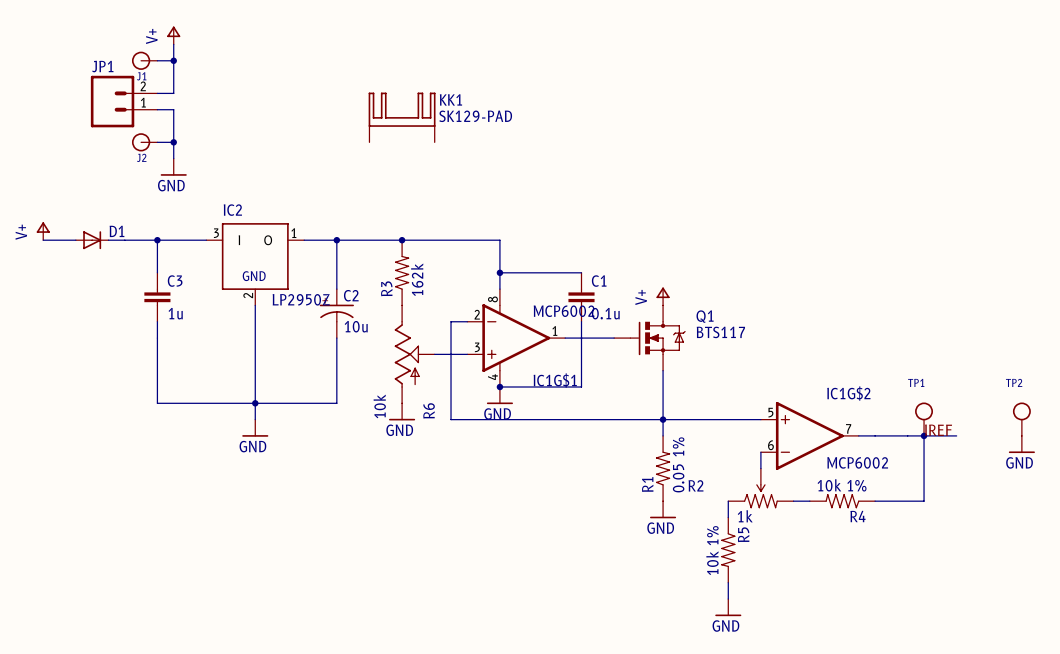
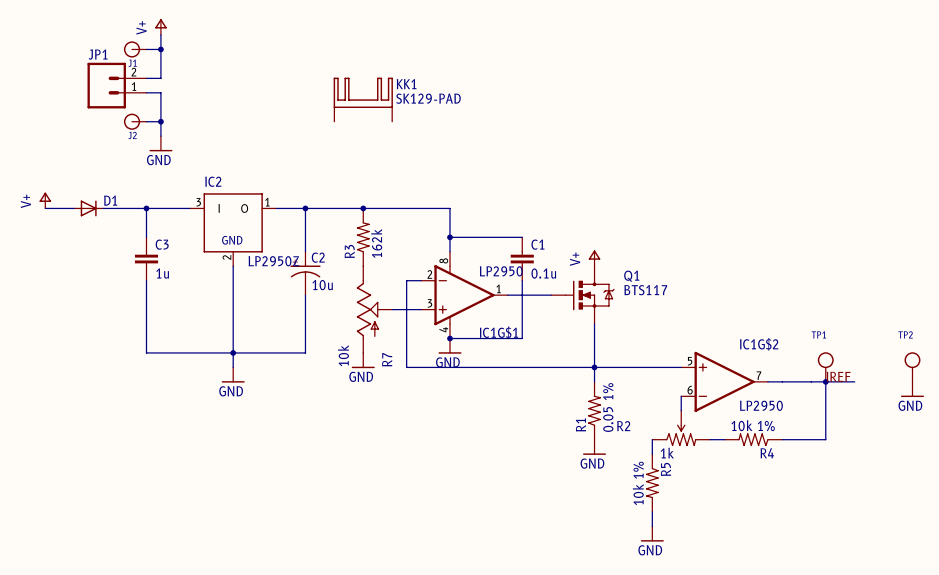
IC1G$1 value: MCP6002 (564, 311) -> LP2950 (501, 271)
R6 name: R6 (429, 410) -> R7 (387, 359)
IC1G$2 value: MCP6002 (857, 462) -> LP2950 (761, 405)

